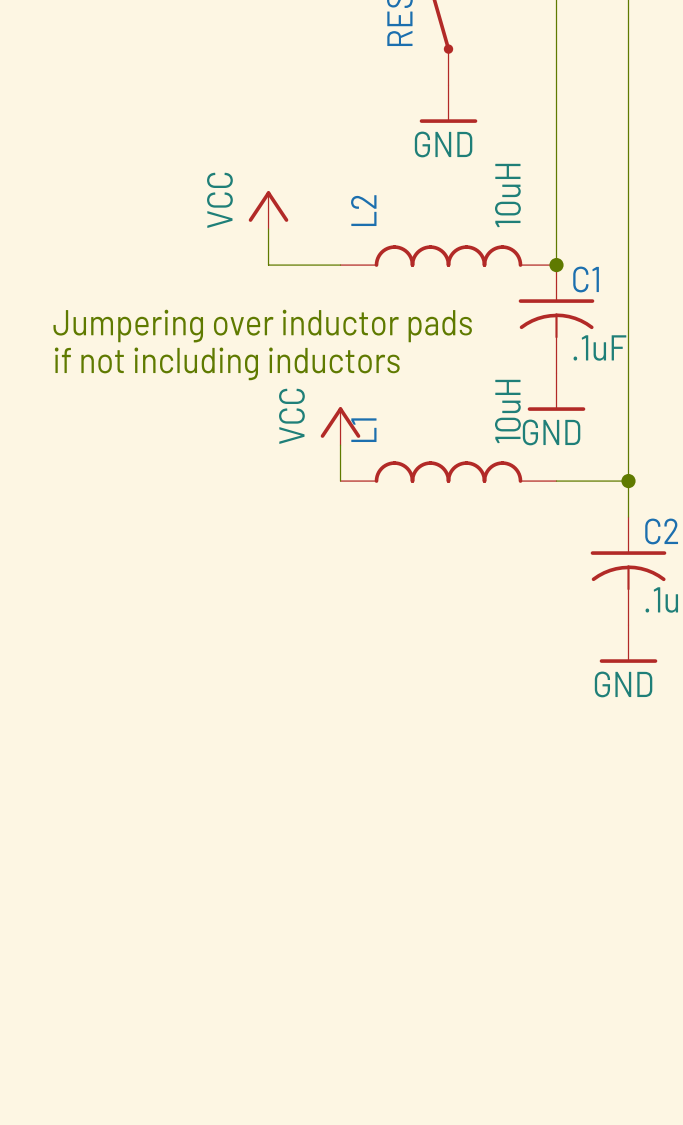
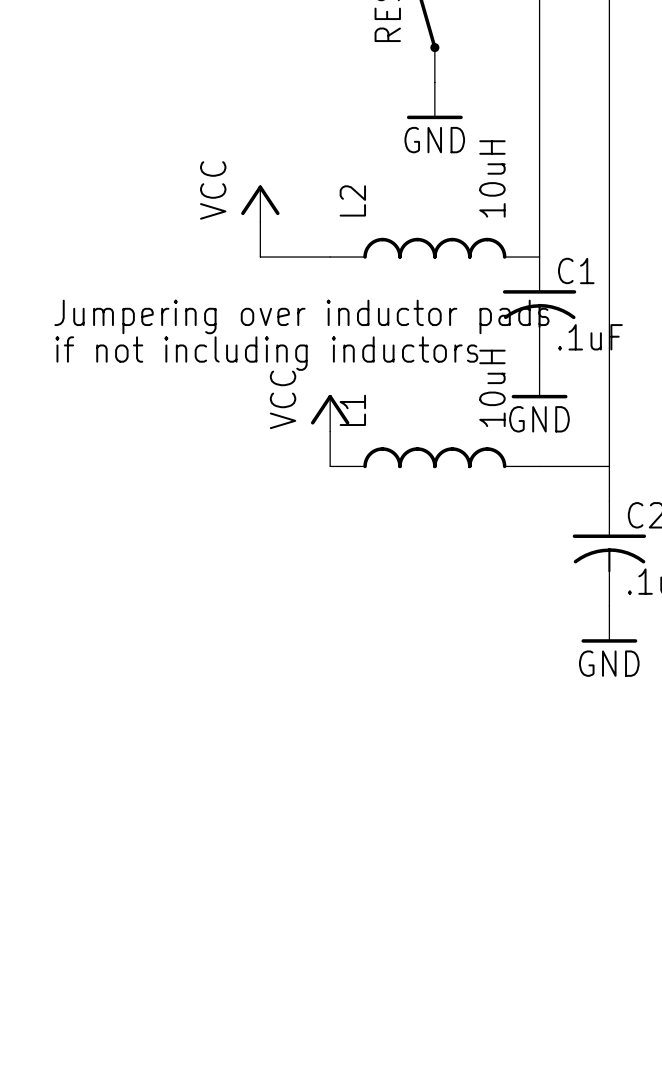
junction: (556, 265) -> none
junction: (628, 481) -> none

